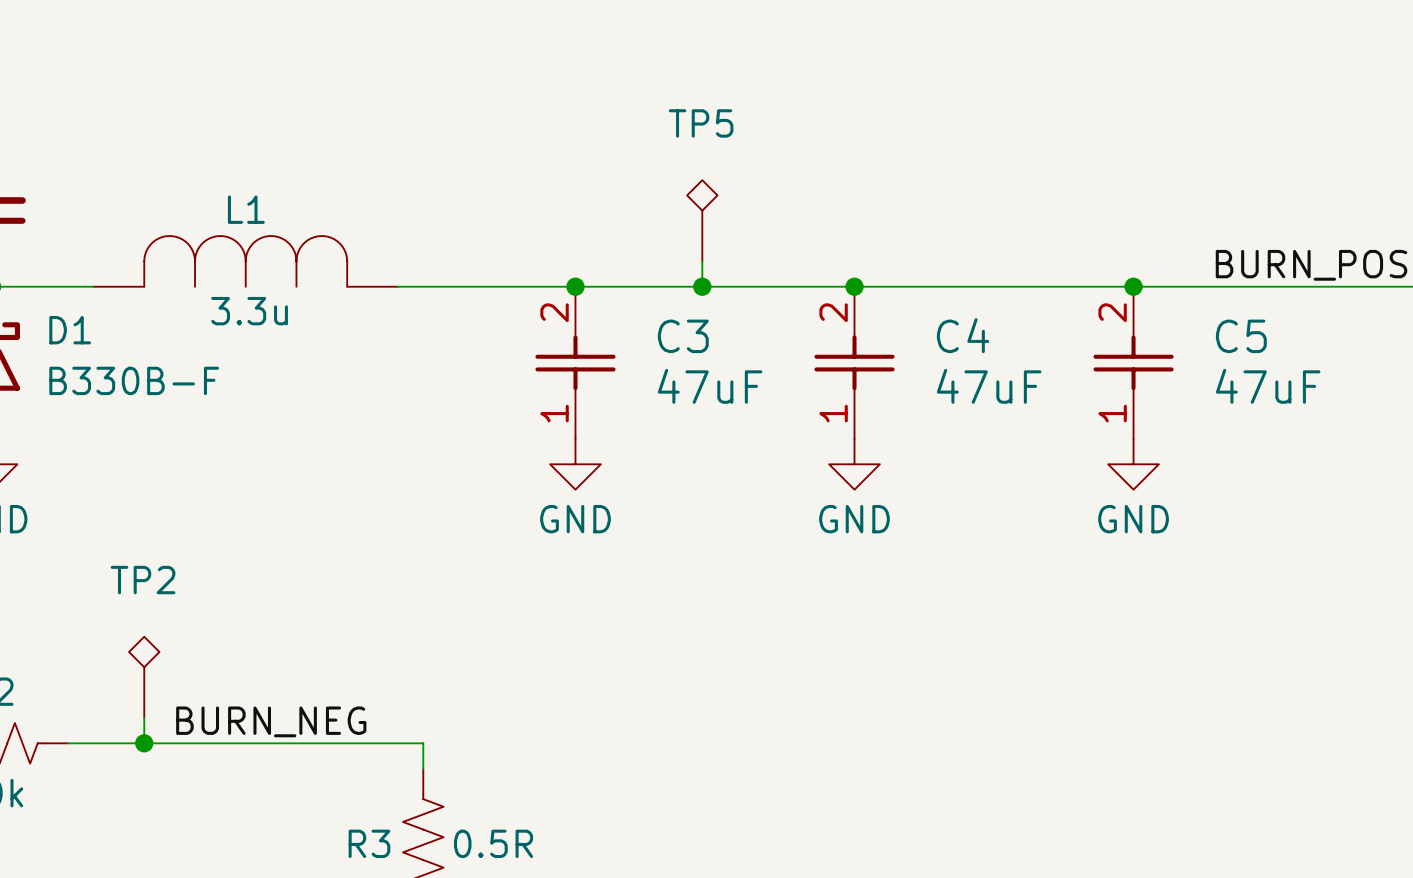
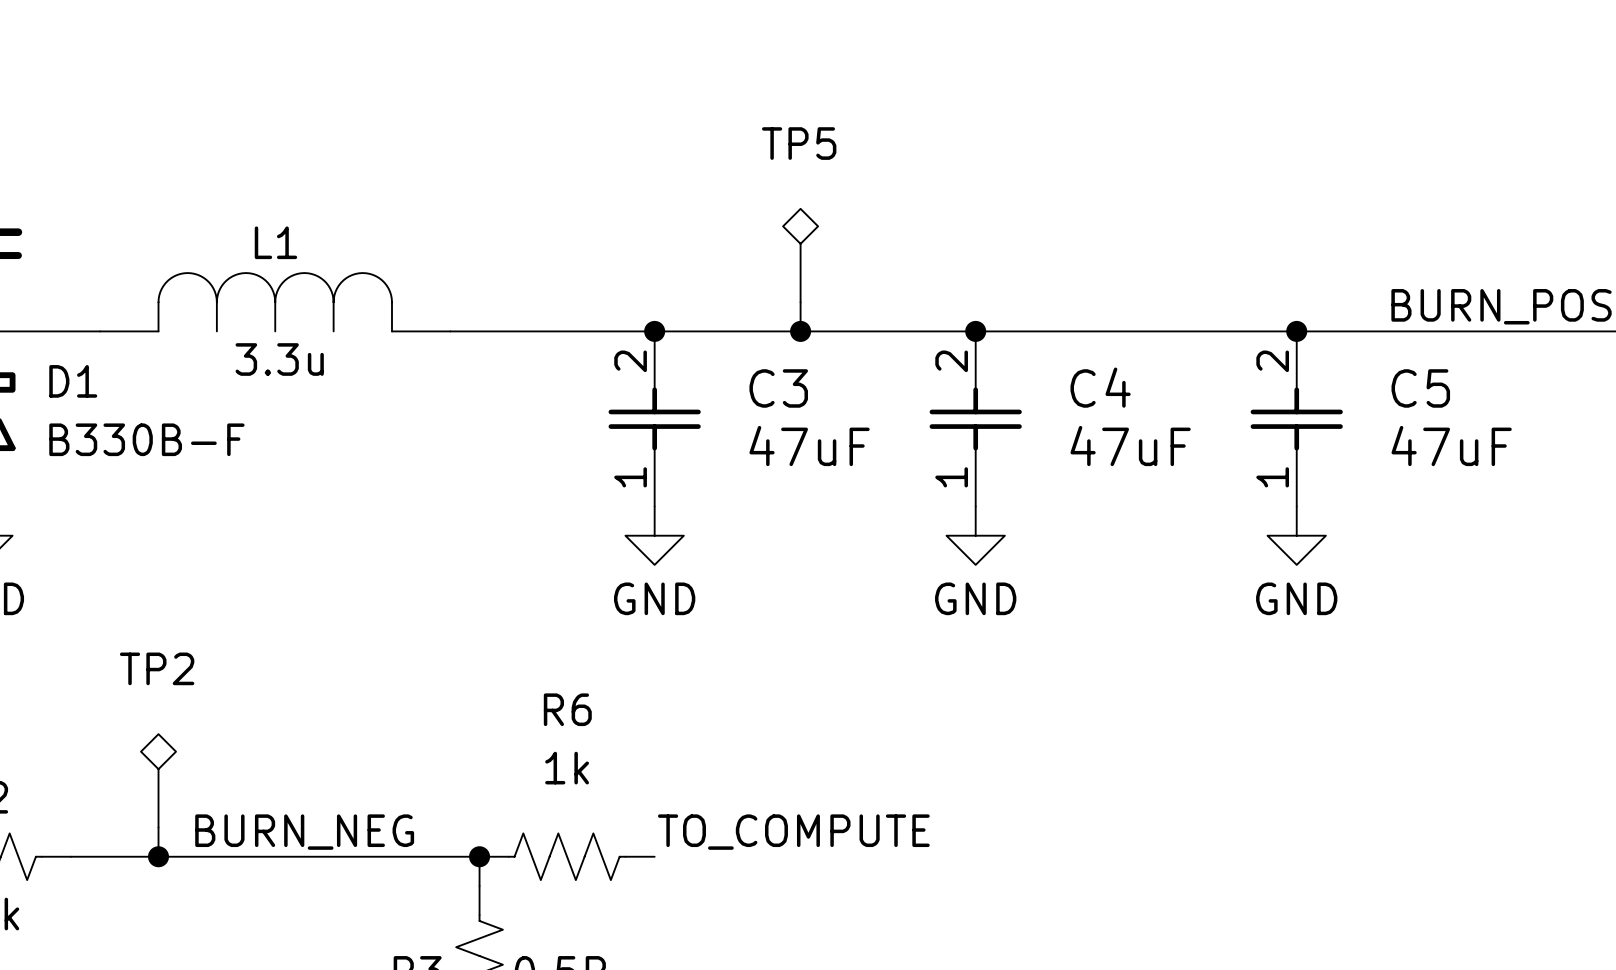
label: none -> TO_COMPUTE (793, 832)
junction: none -> (479, 856)
R6: none -> 1k (567, 856)

